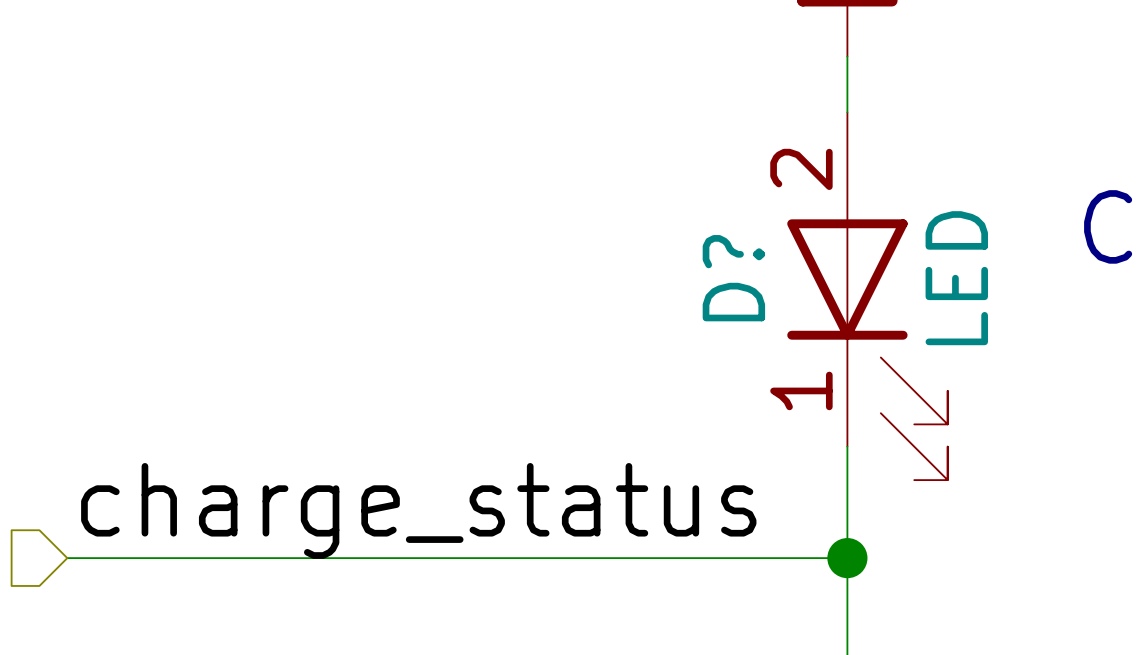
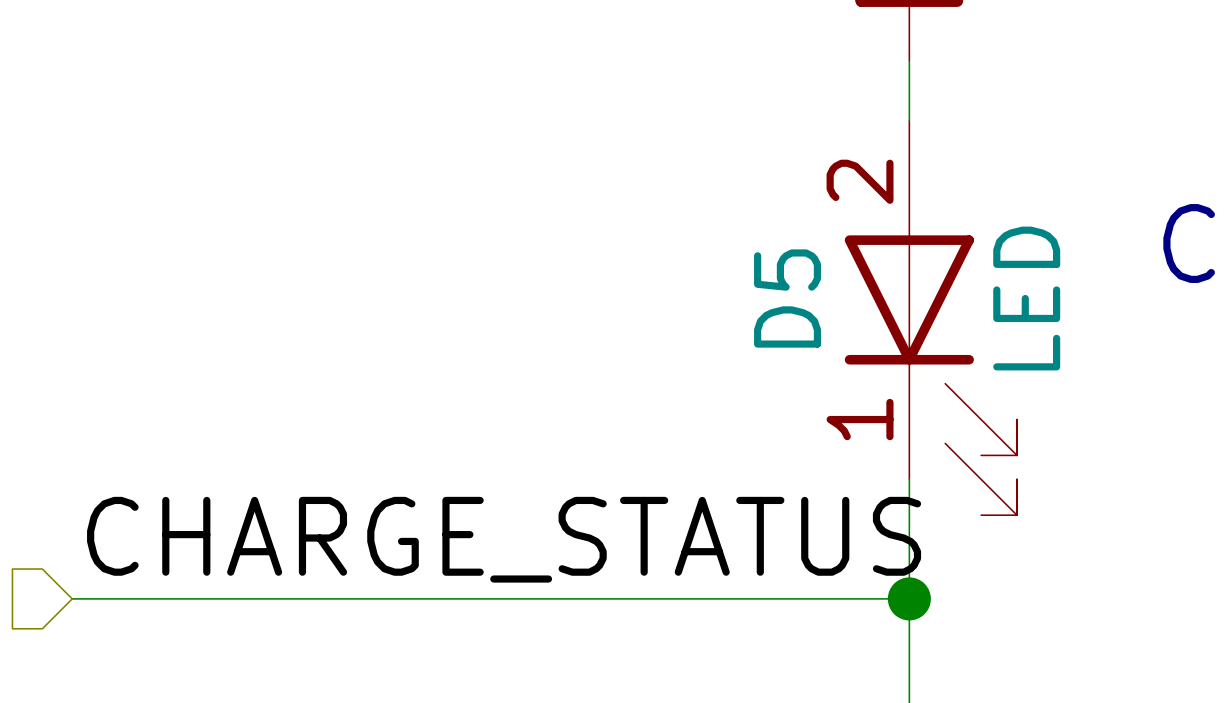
D? name: D? (733, 278) -> D5 (787, 298)
label: charge_status (418, 510) -> CHARGE_STATUS (504, 539)

